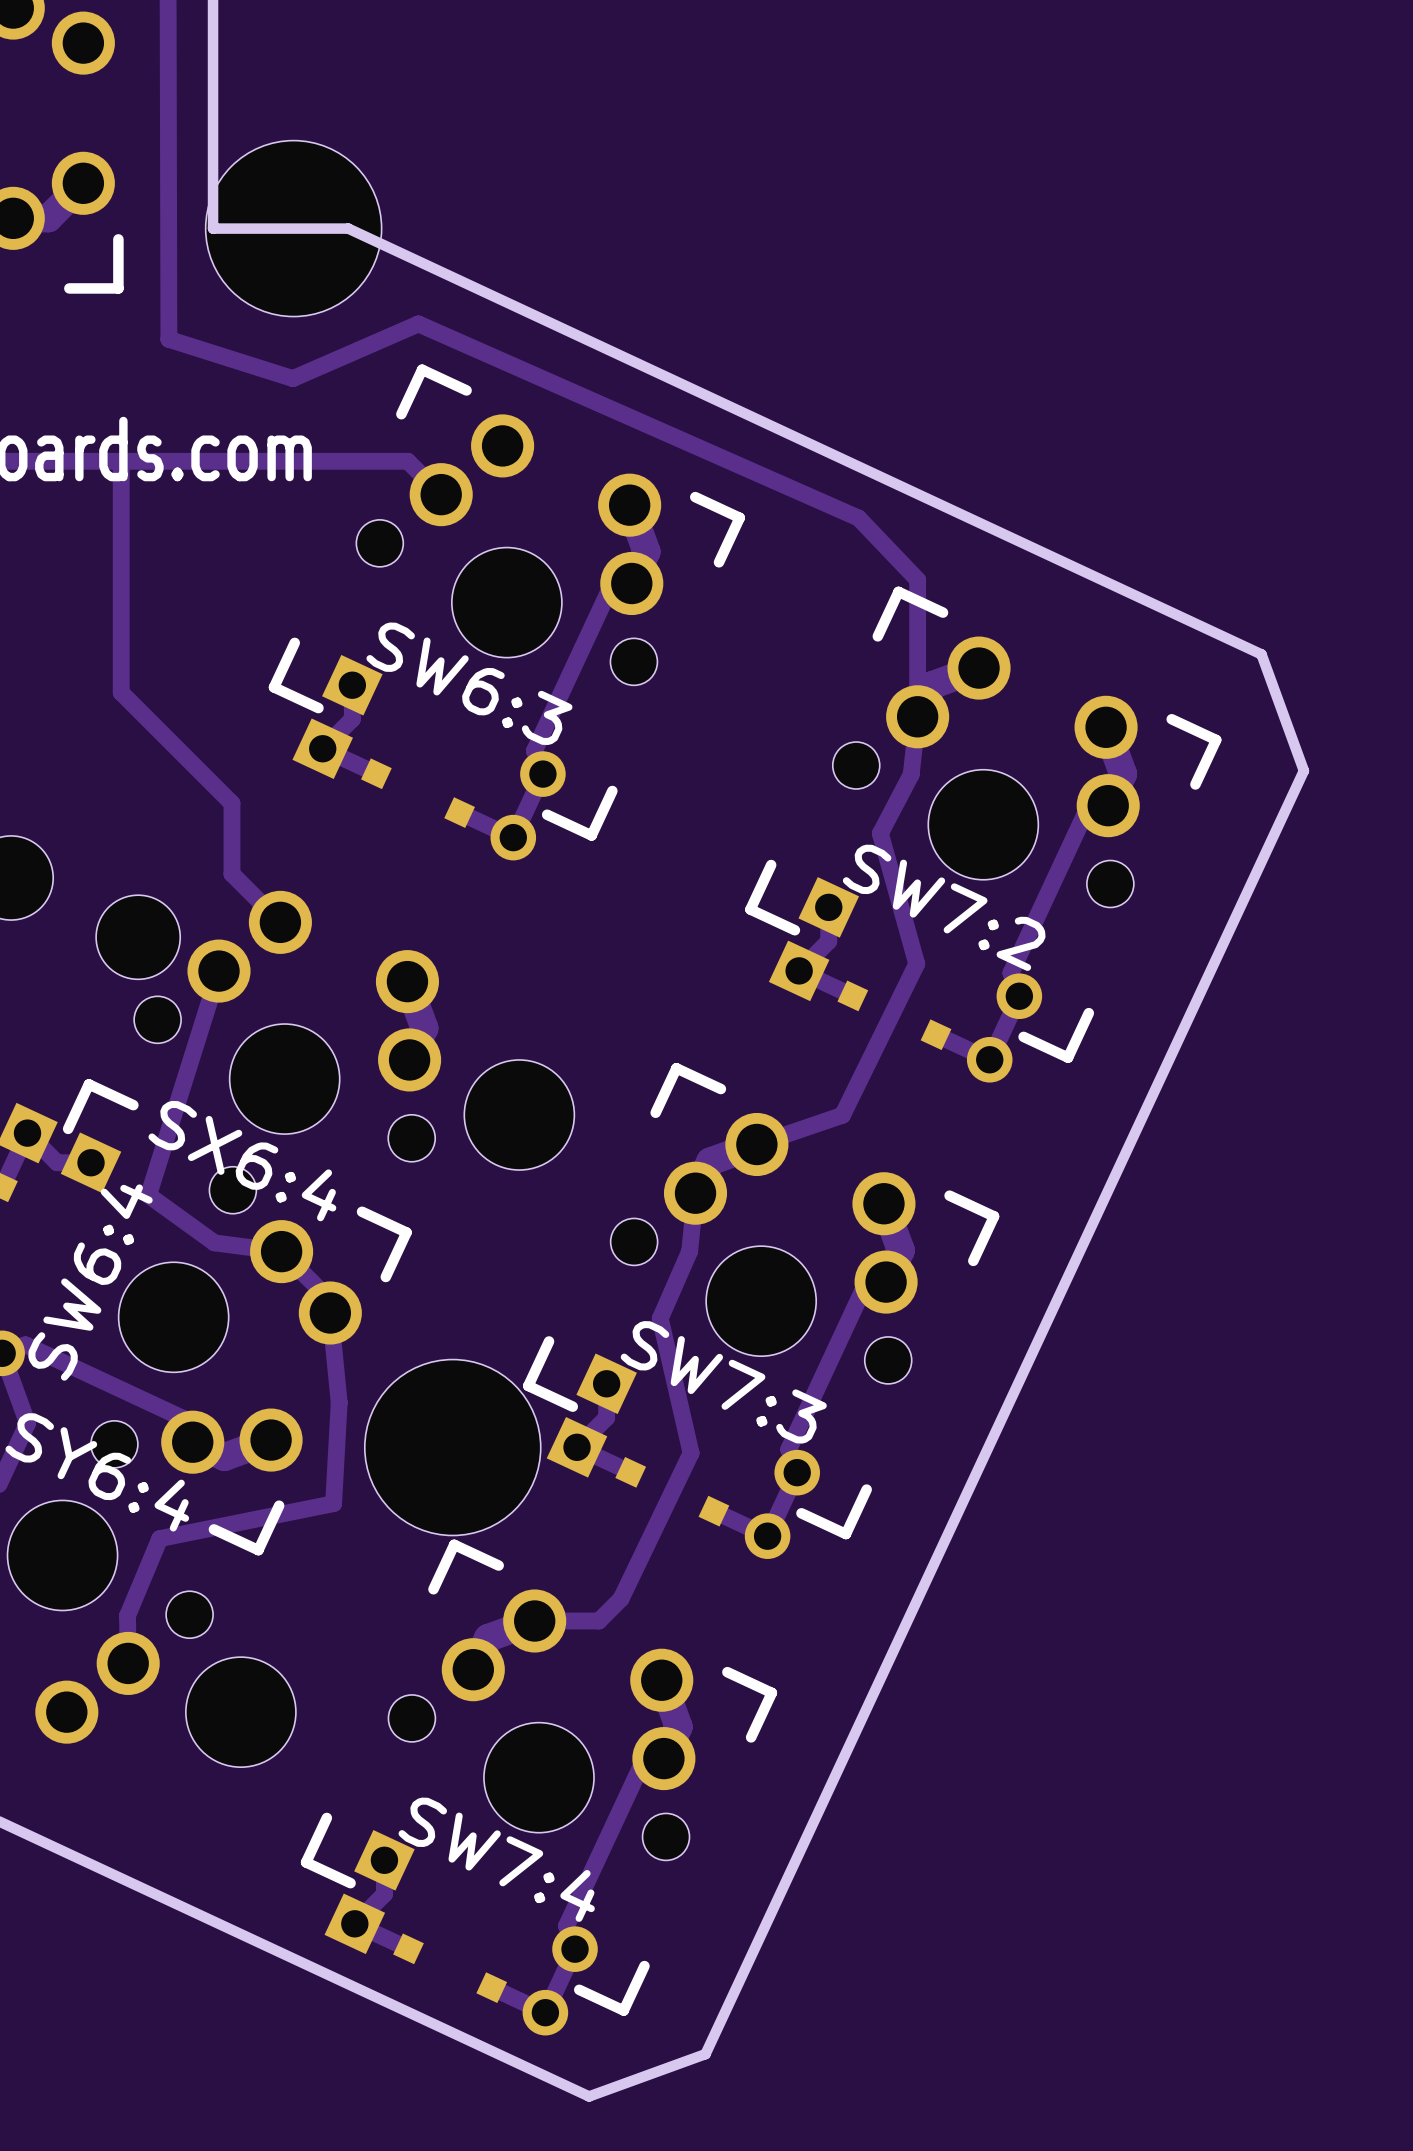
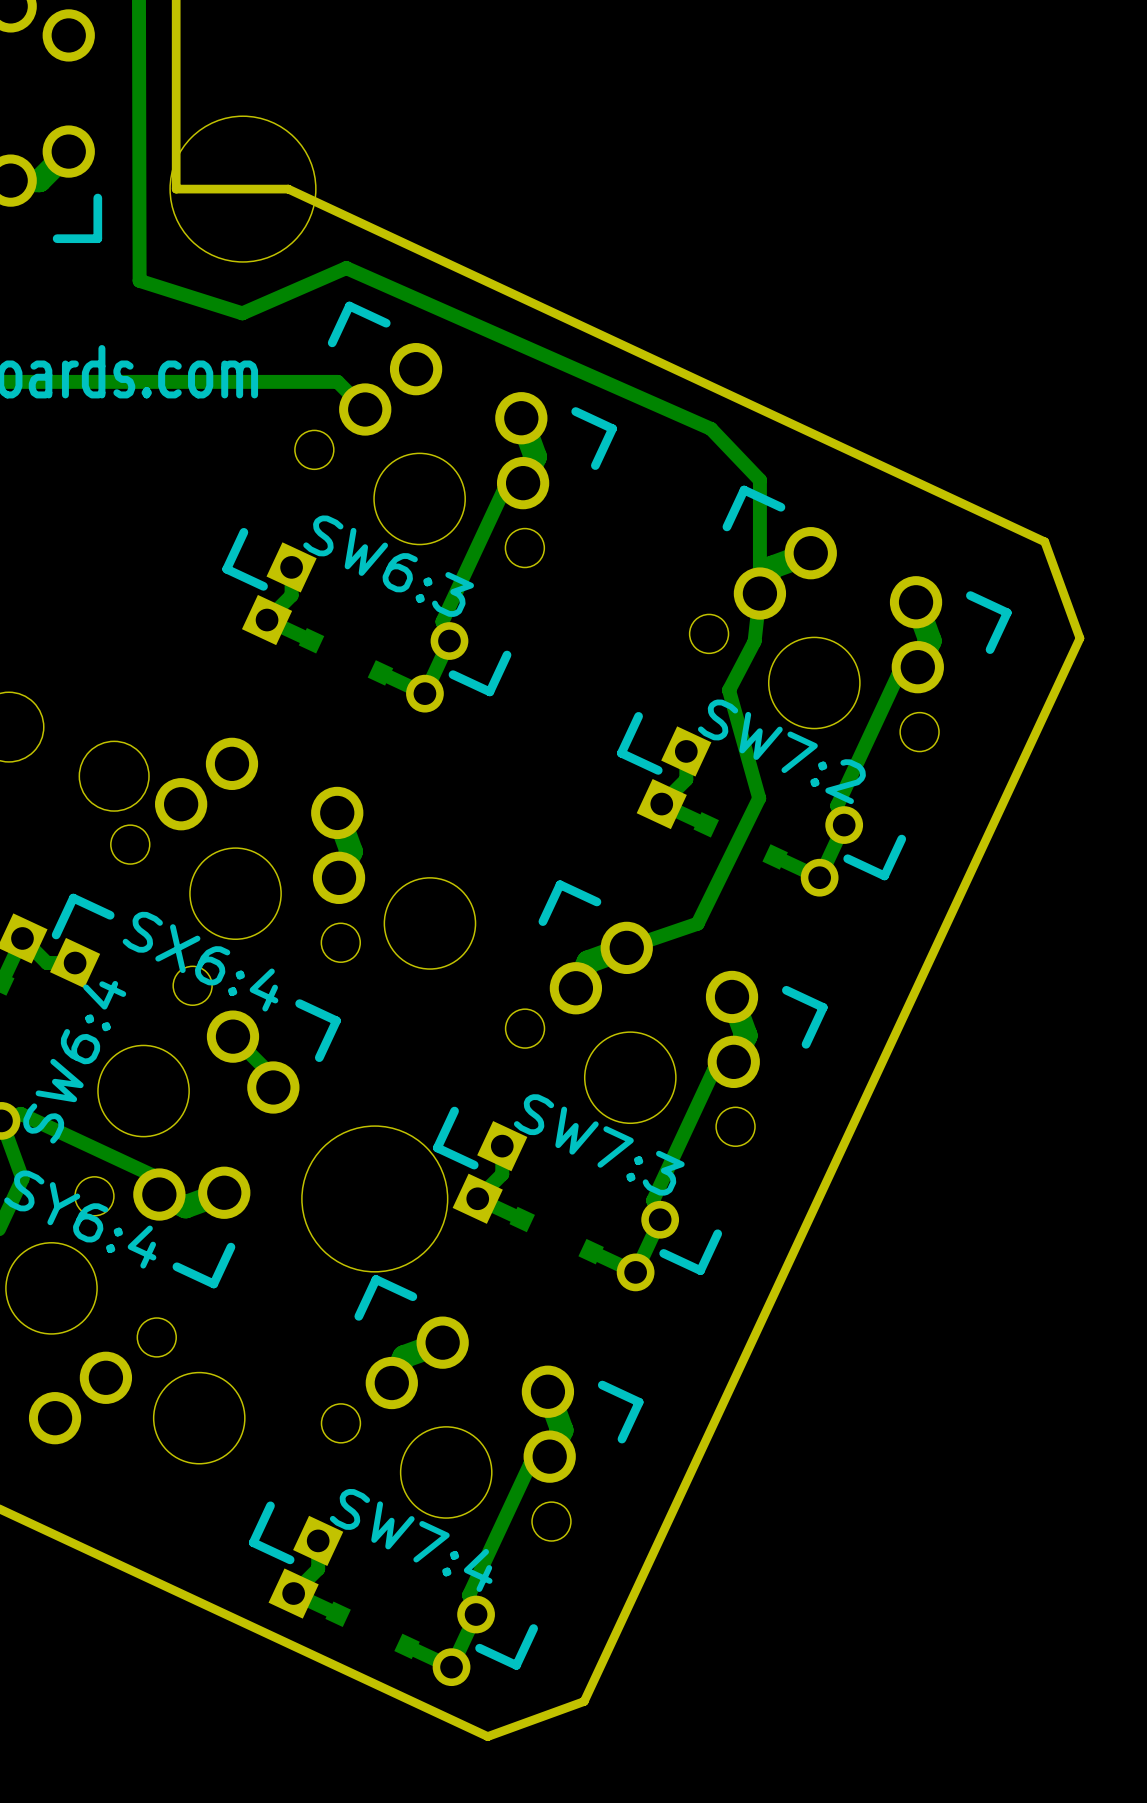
track: (121, 461) (121, 692) (231, 803) (231, 873) (280, 922) -> none
track: (219, 971) (148, 1195) (214, 1242) (281, 1251) -> none
track: (695, 1193) (689, 1251) (660, 1318) (691, 1453) (620, 1598) (598, 1620) (534, 1620) -> none
track: (330, 1313) (339, 1402) (333, 1503) (159, 1538) (127, 1615) (128, 1663) -> none

